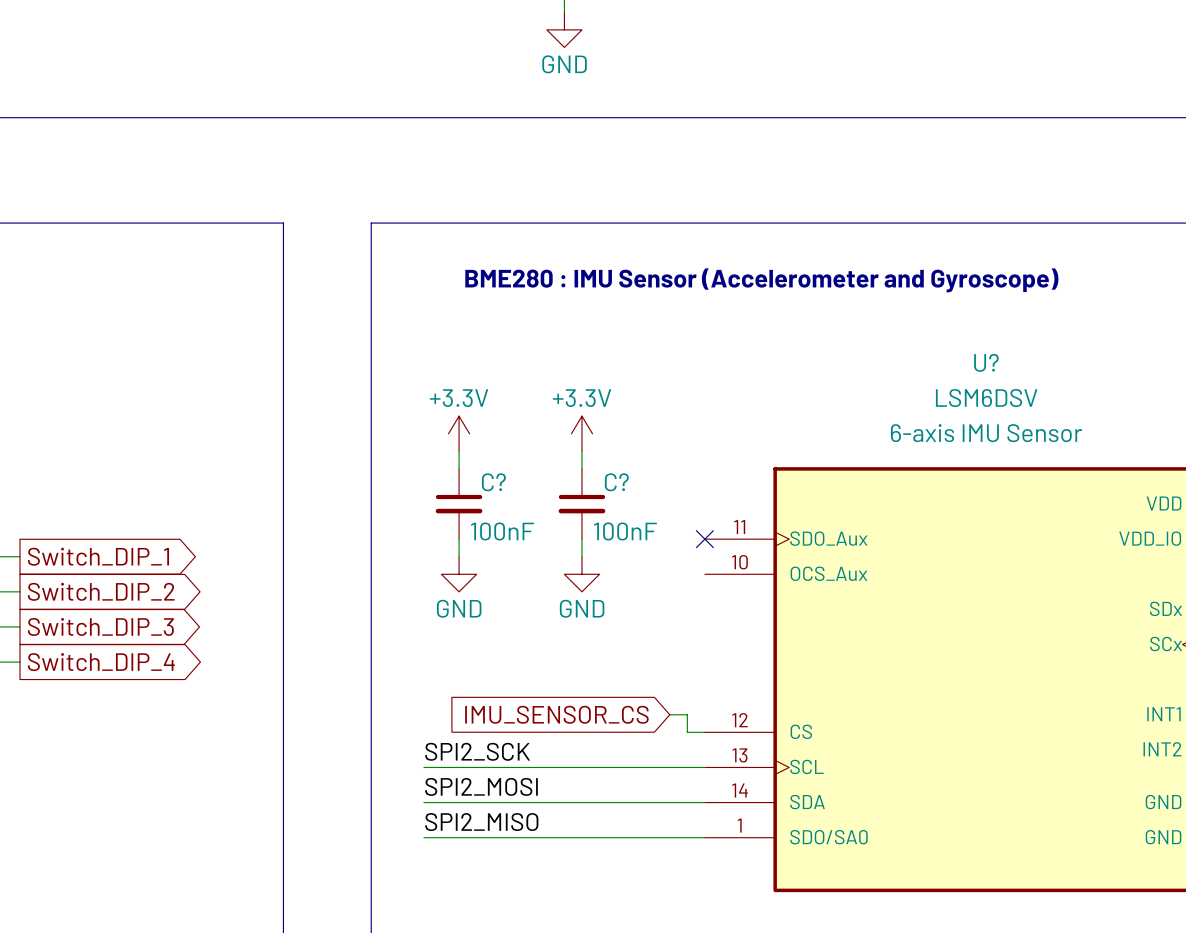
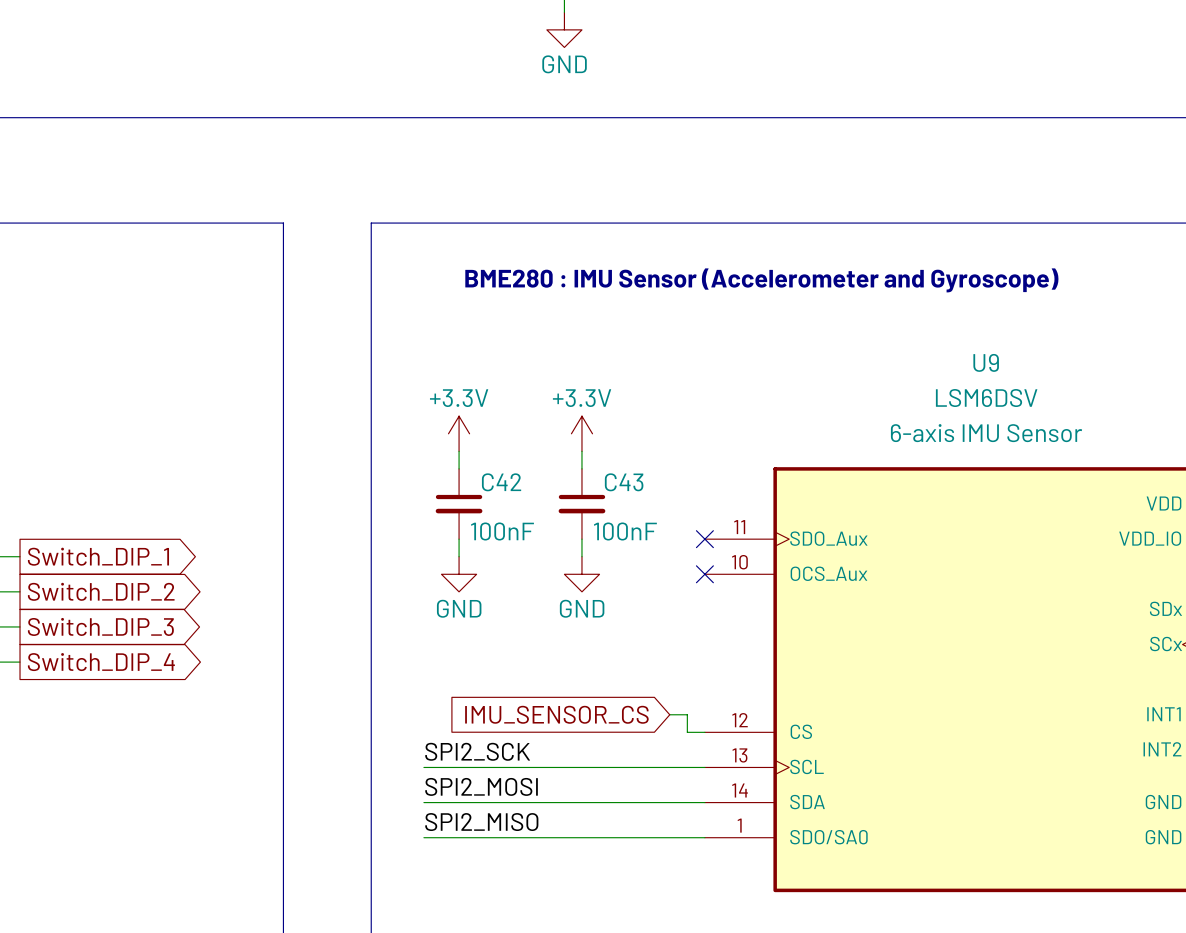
U? name: U? (986, 362) -> U9 (986, 362)
C? name: C? (493, 482) -> C42 (501, 482)
C? name: C? (616, 482) -> C43 (624, 482)
no-connect mark: none -> (704, 574)

